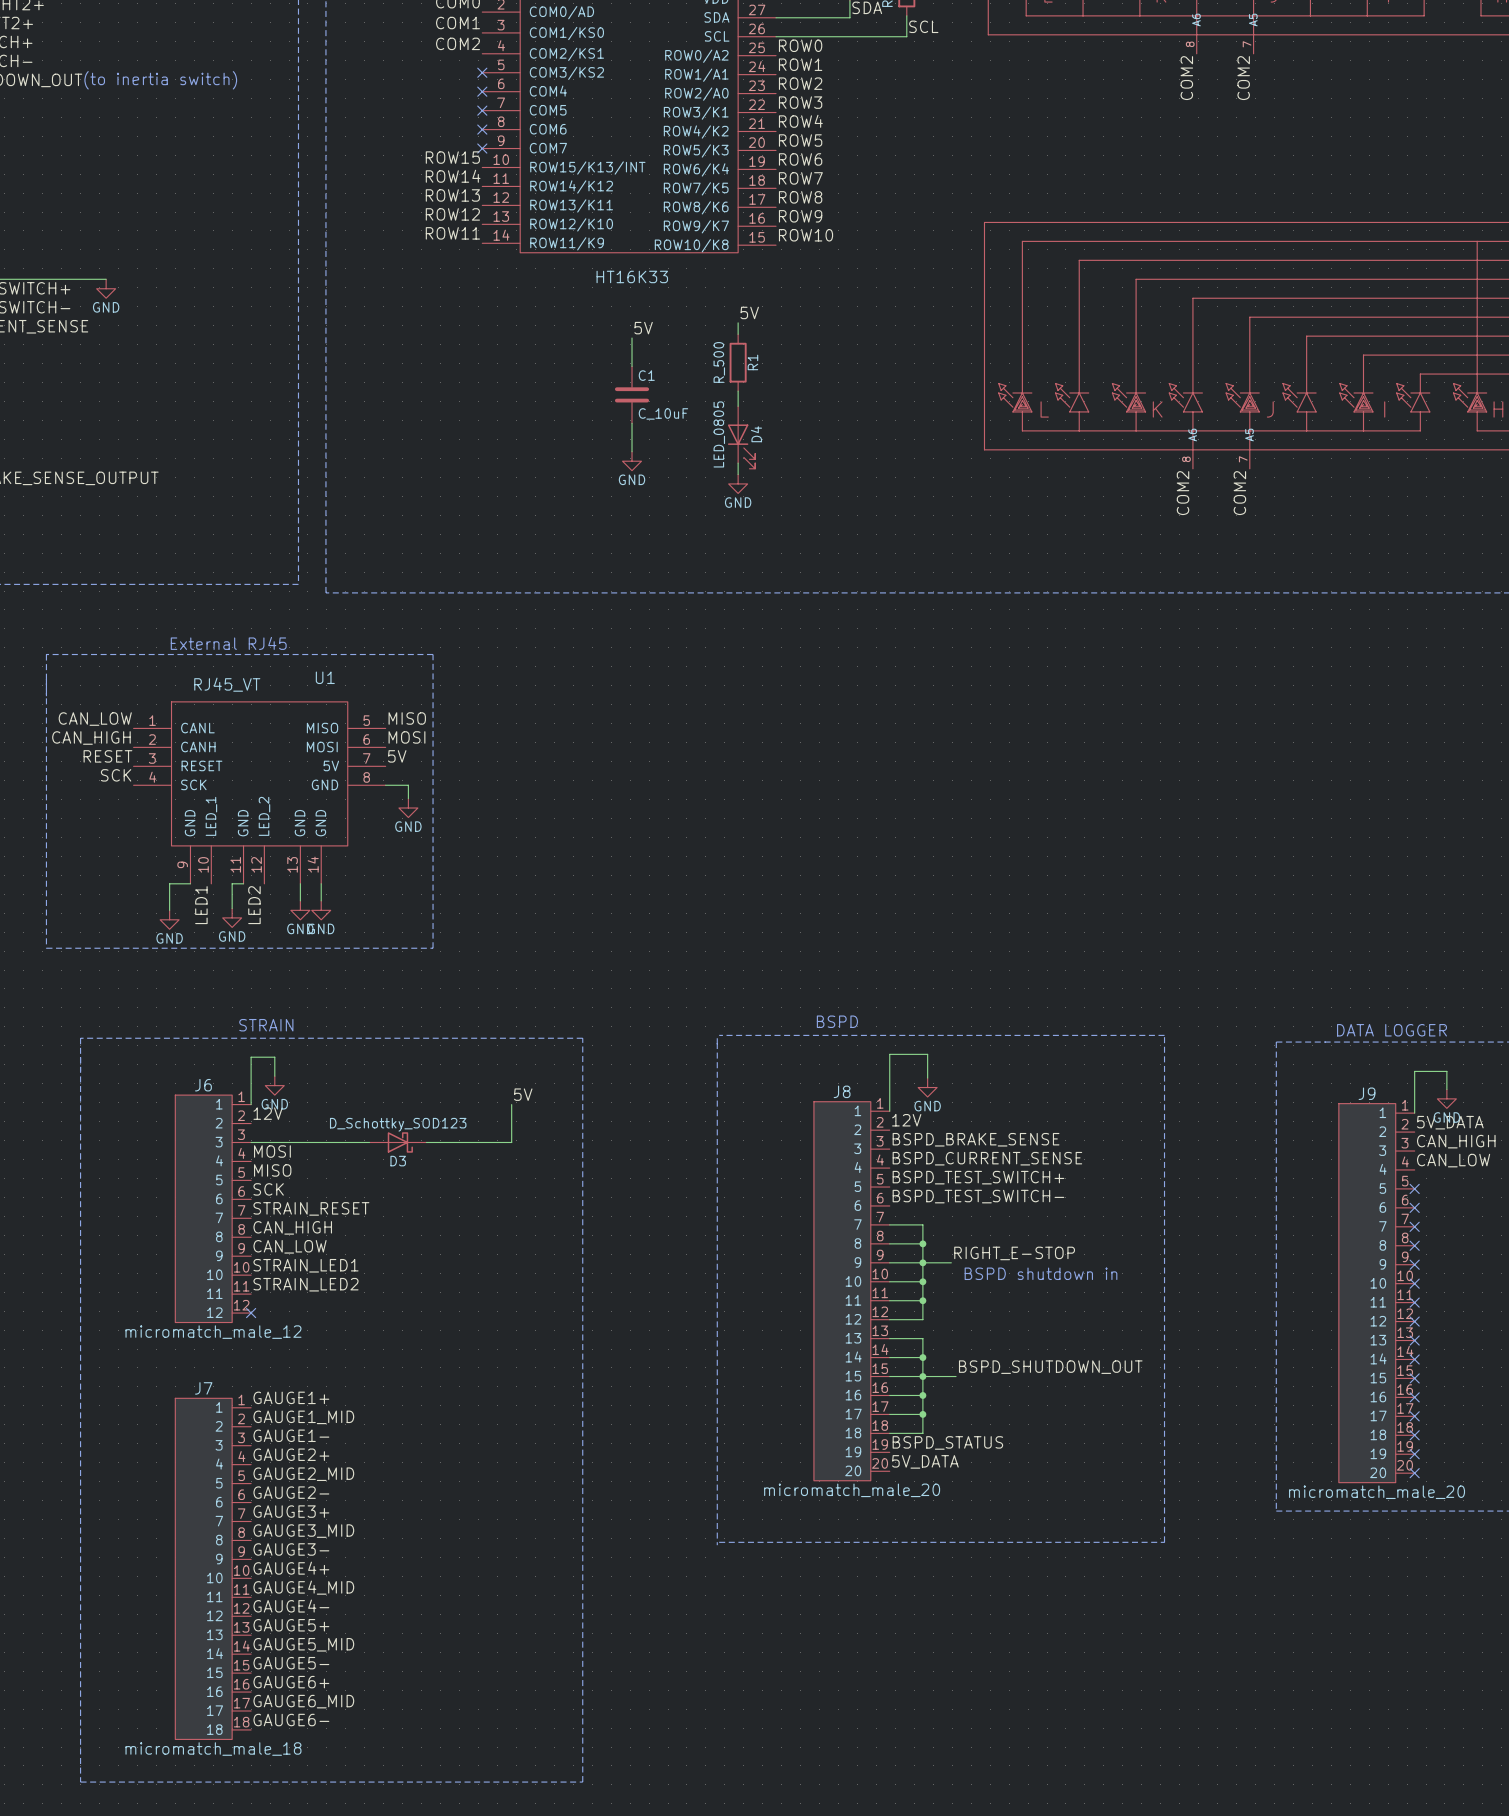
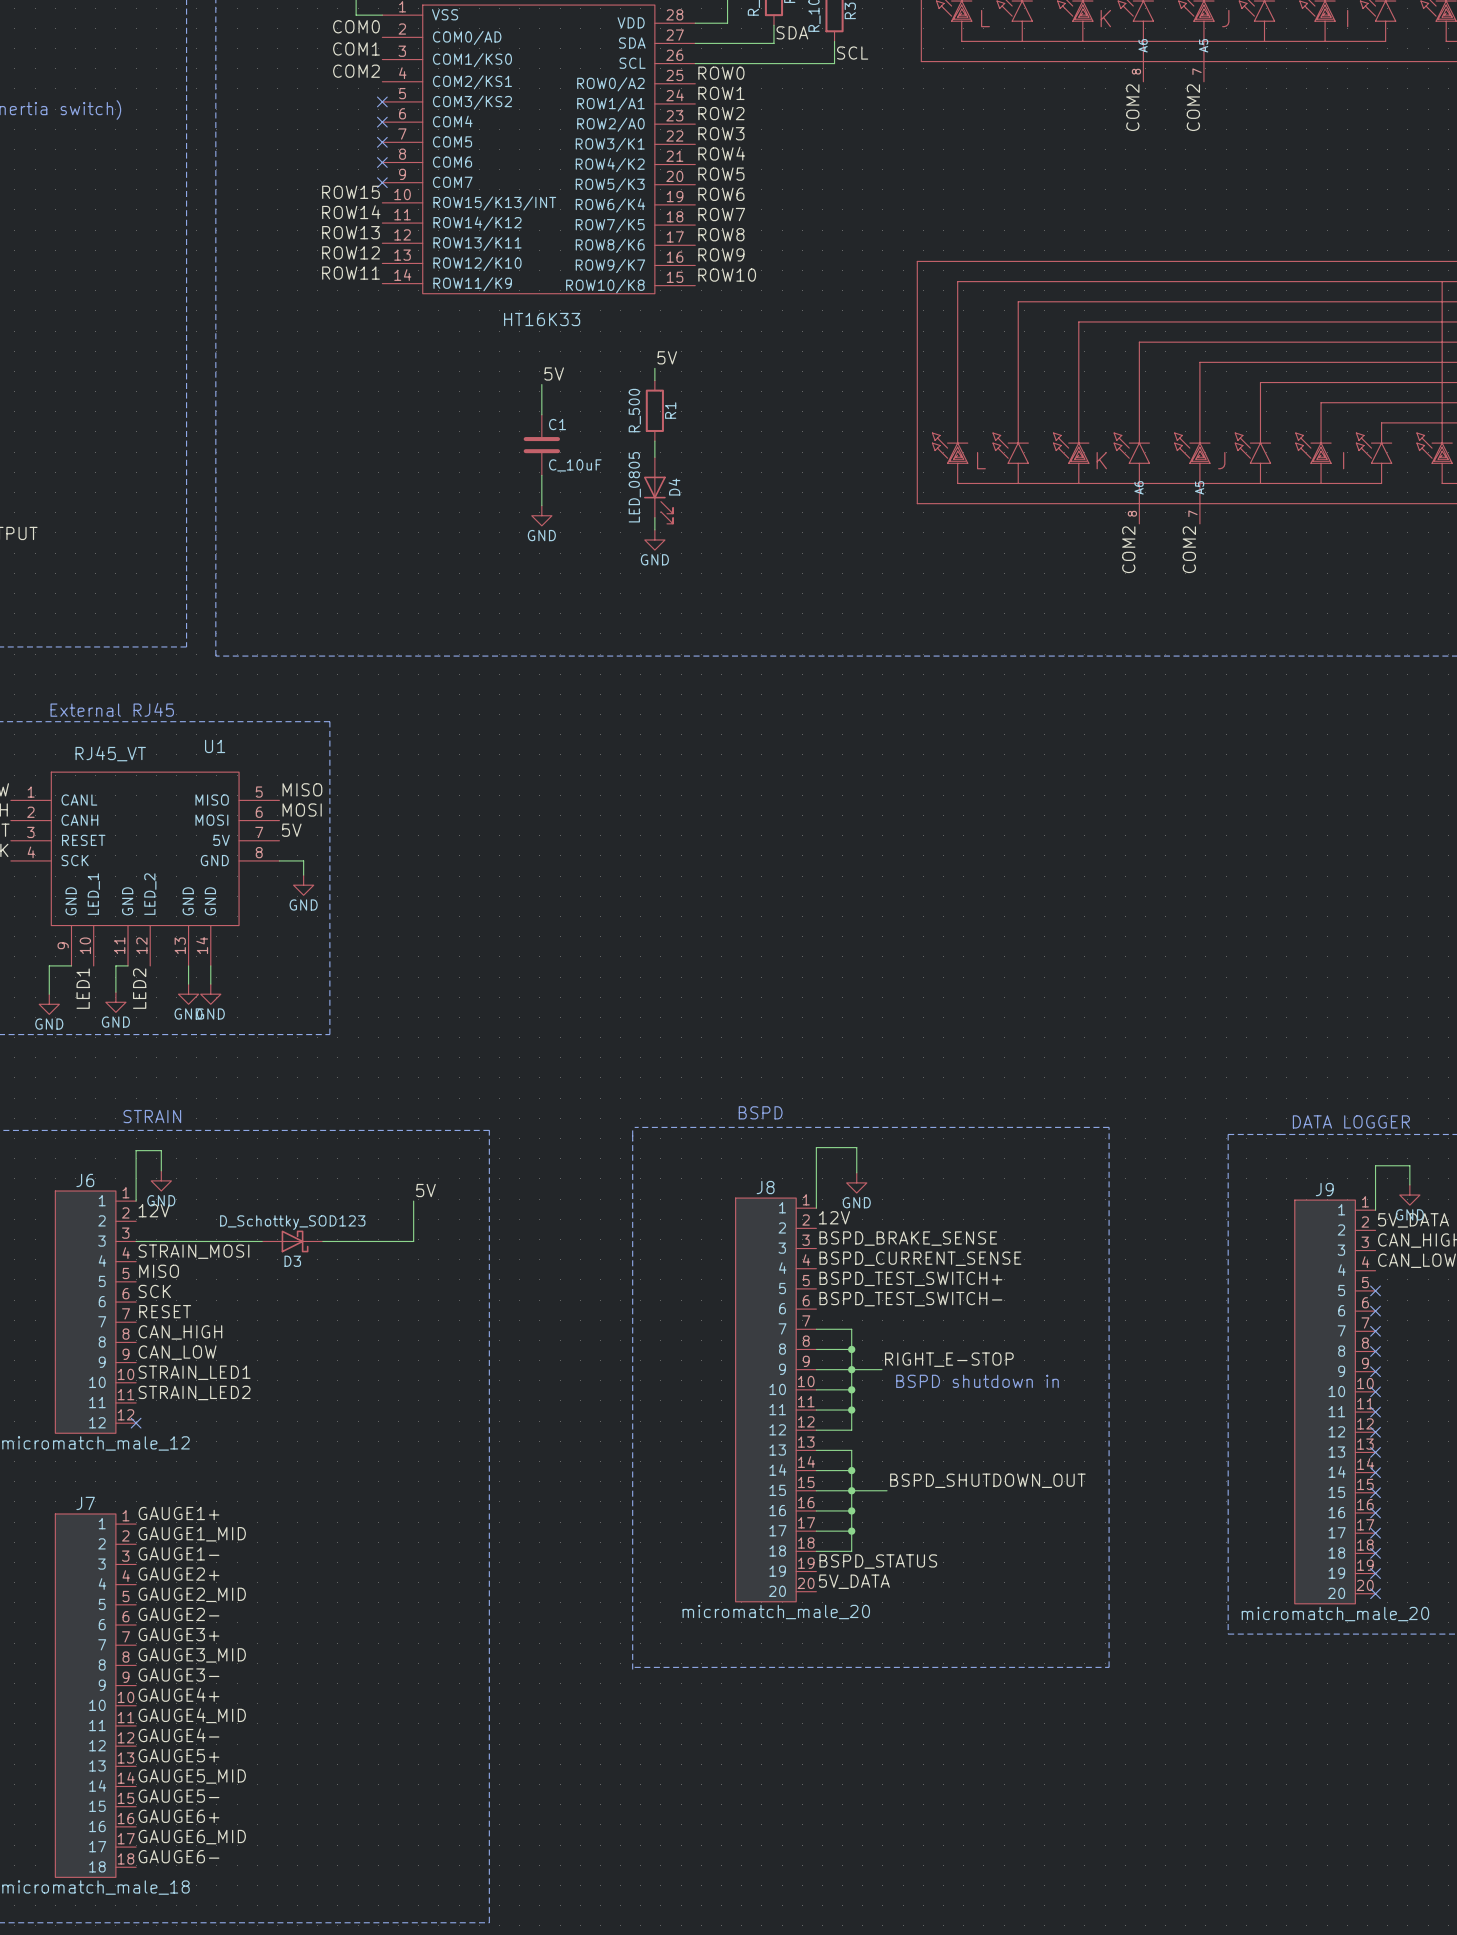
label: MOSI (272, 1151) -> STRAIN_MOSI (193, 1251)
label: STRAIN_RESET (311, 1208) -> RESET (165, 1311)

